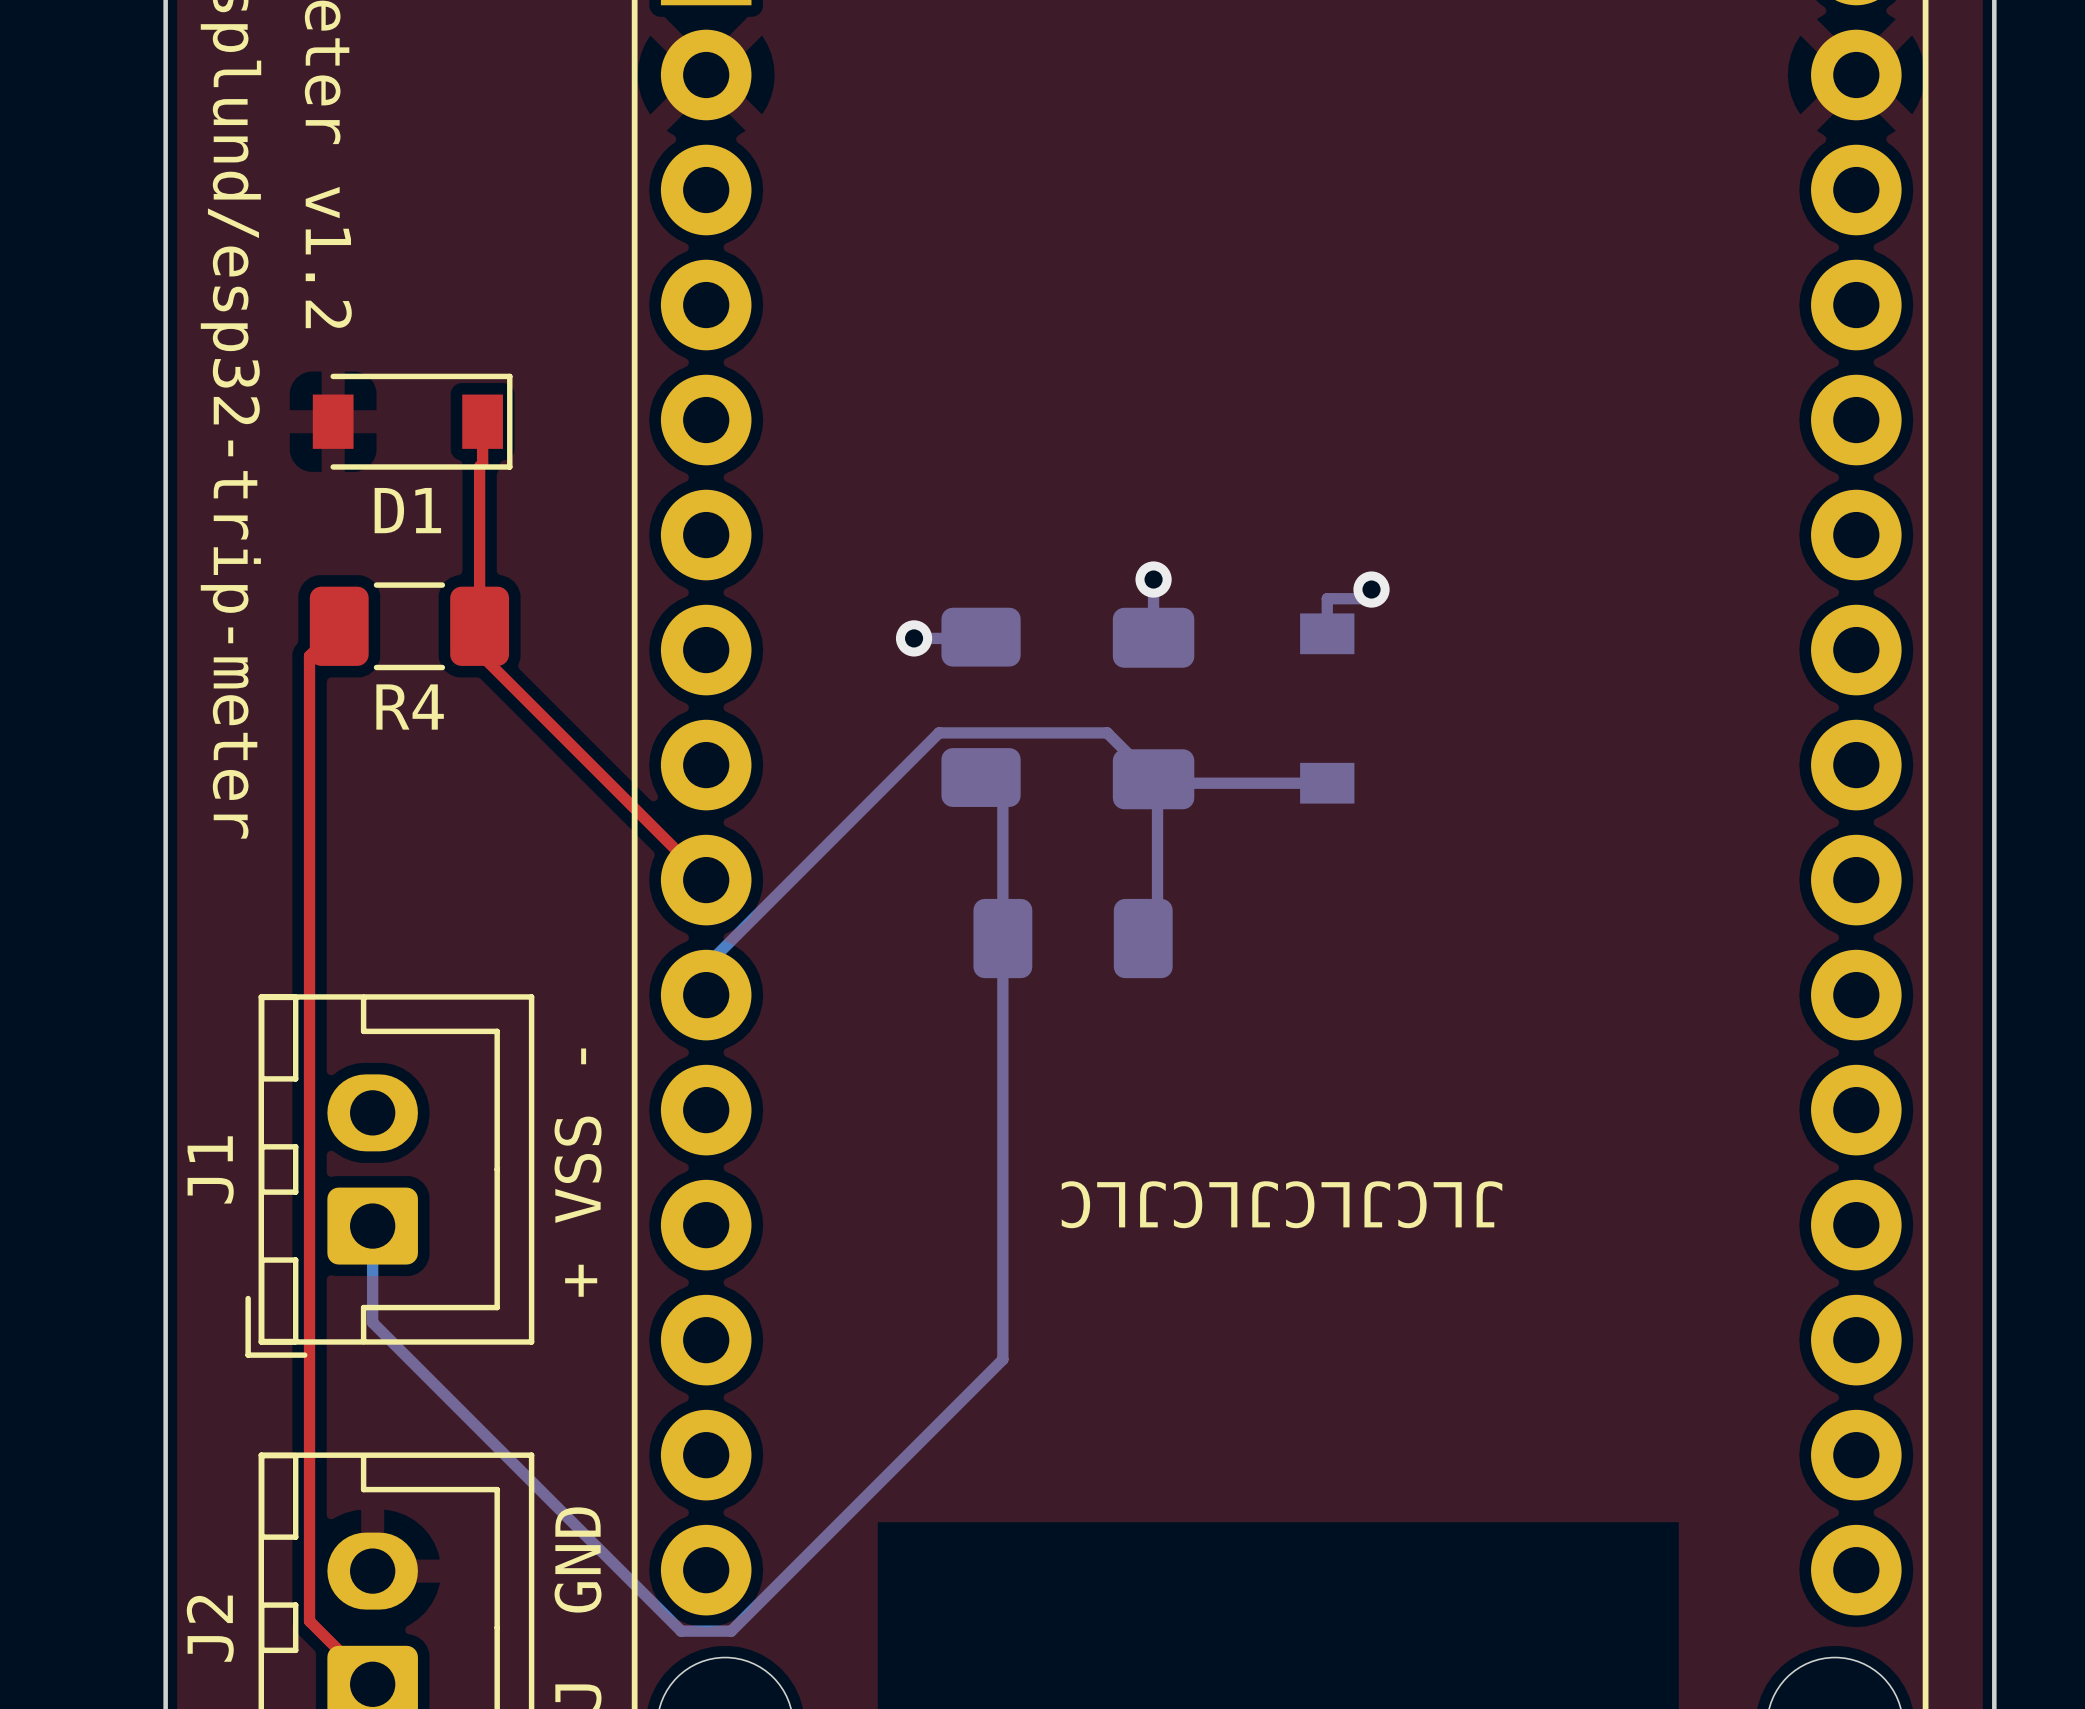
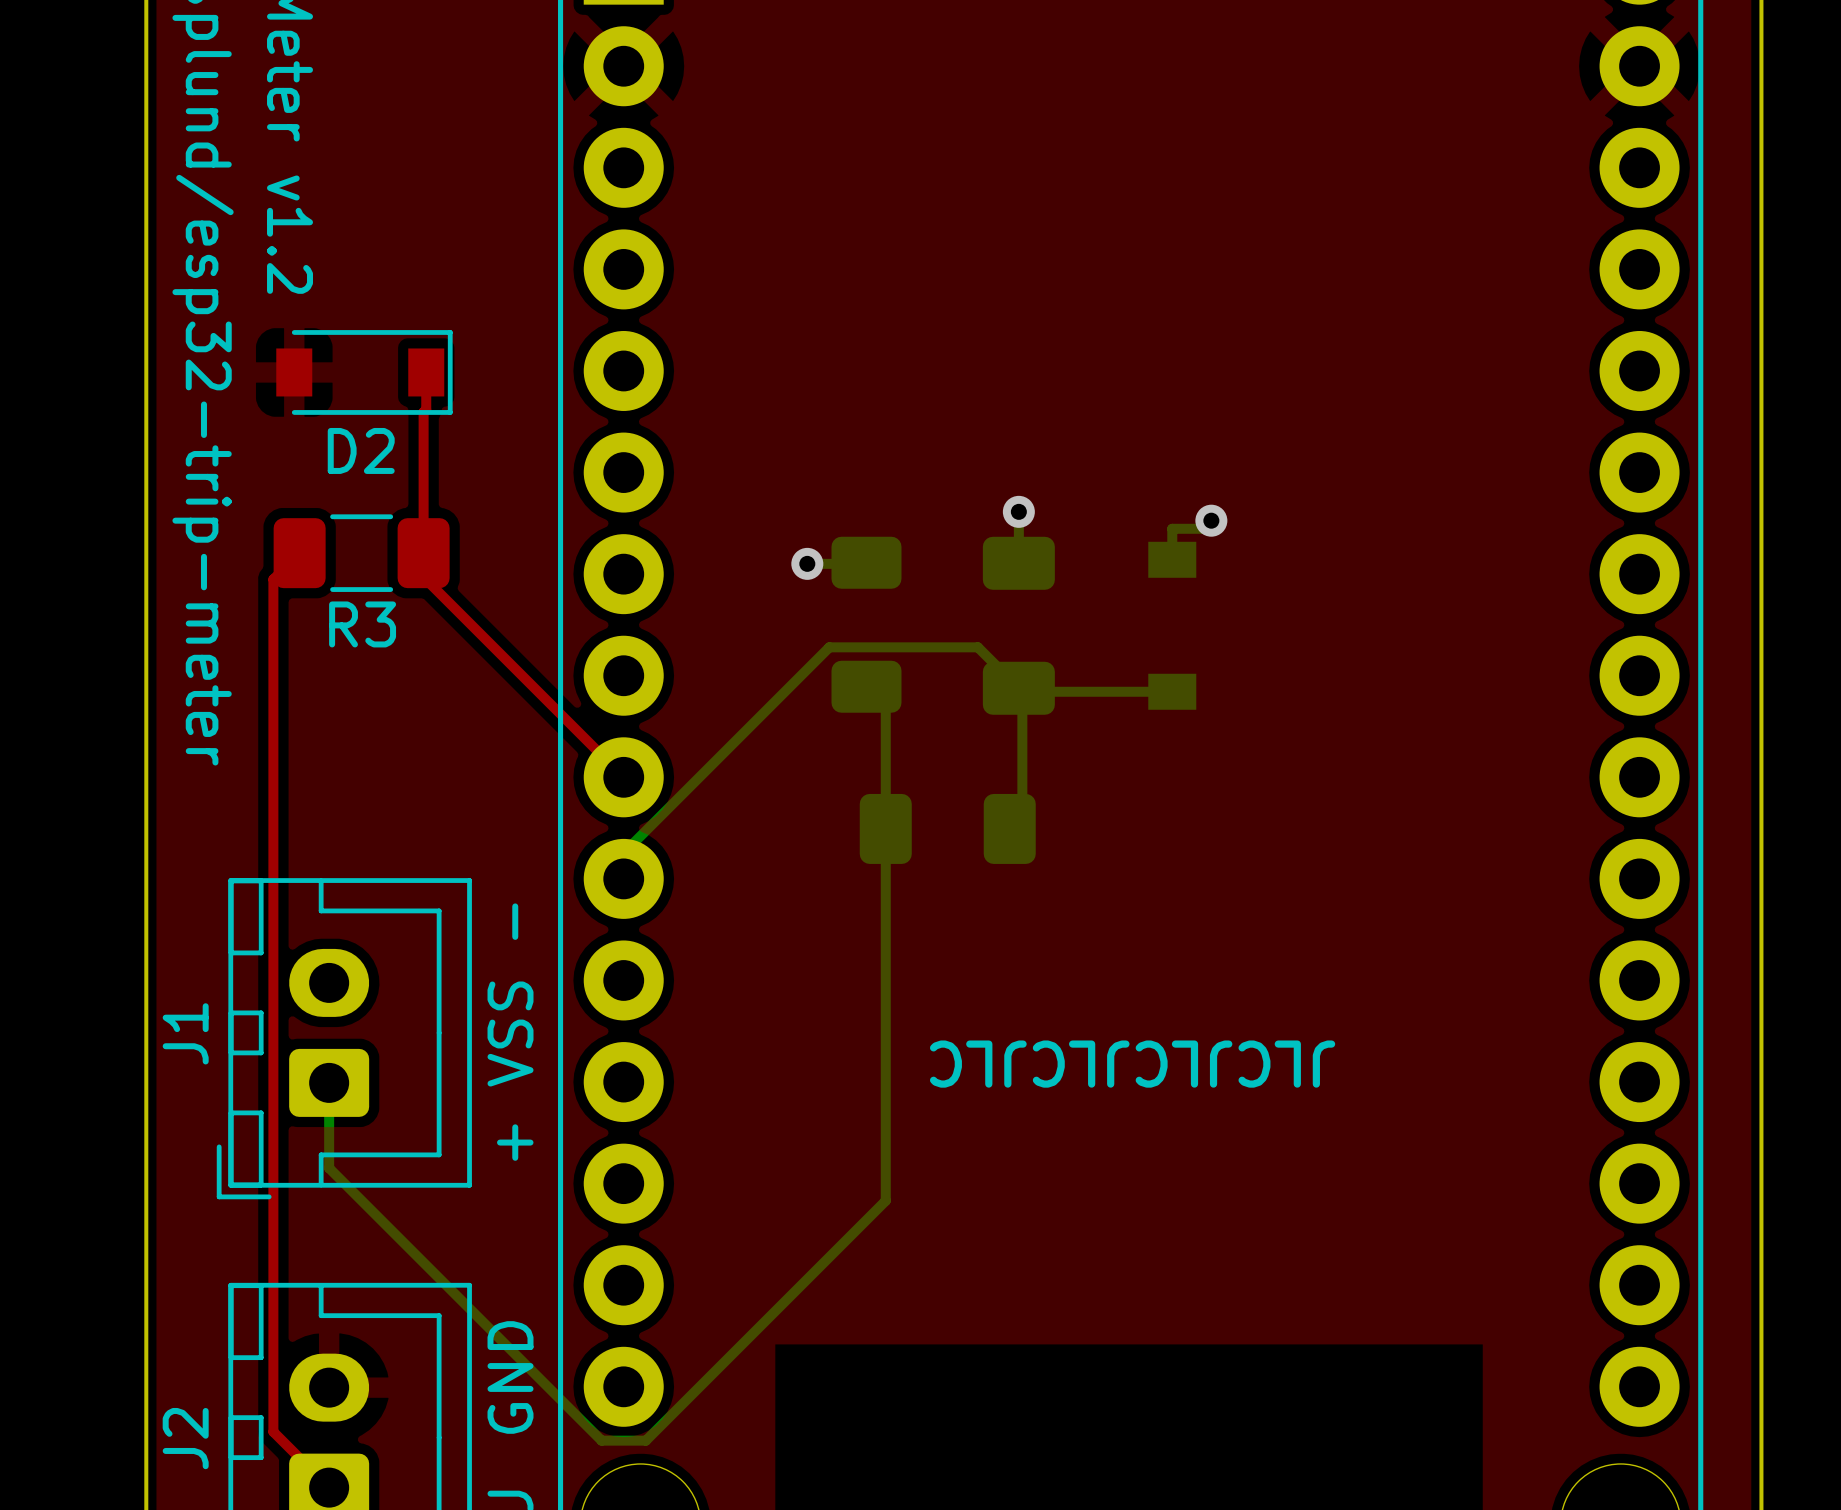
D1 name: D1 (407, 510) -> D2 (361, 450)
R4 name: R4 (410, 707) -> R3 (362, 624)

